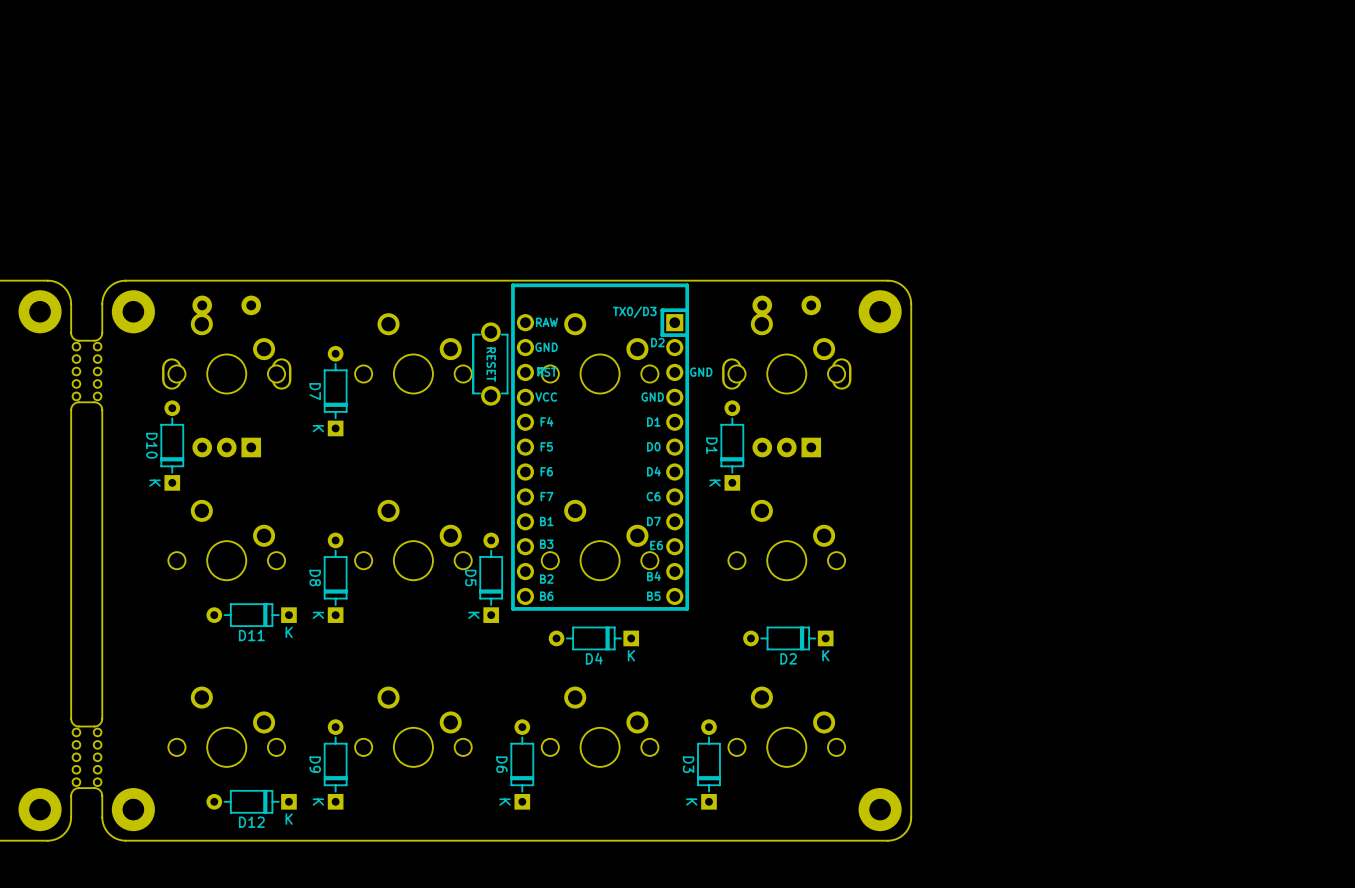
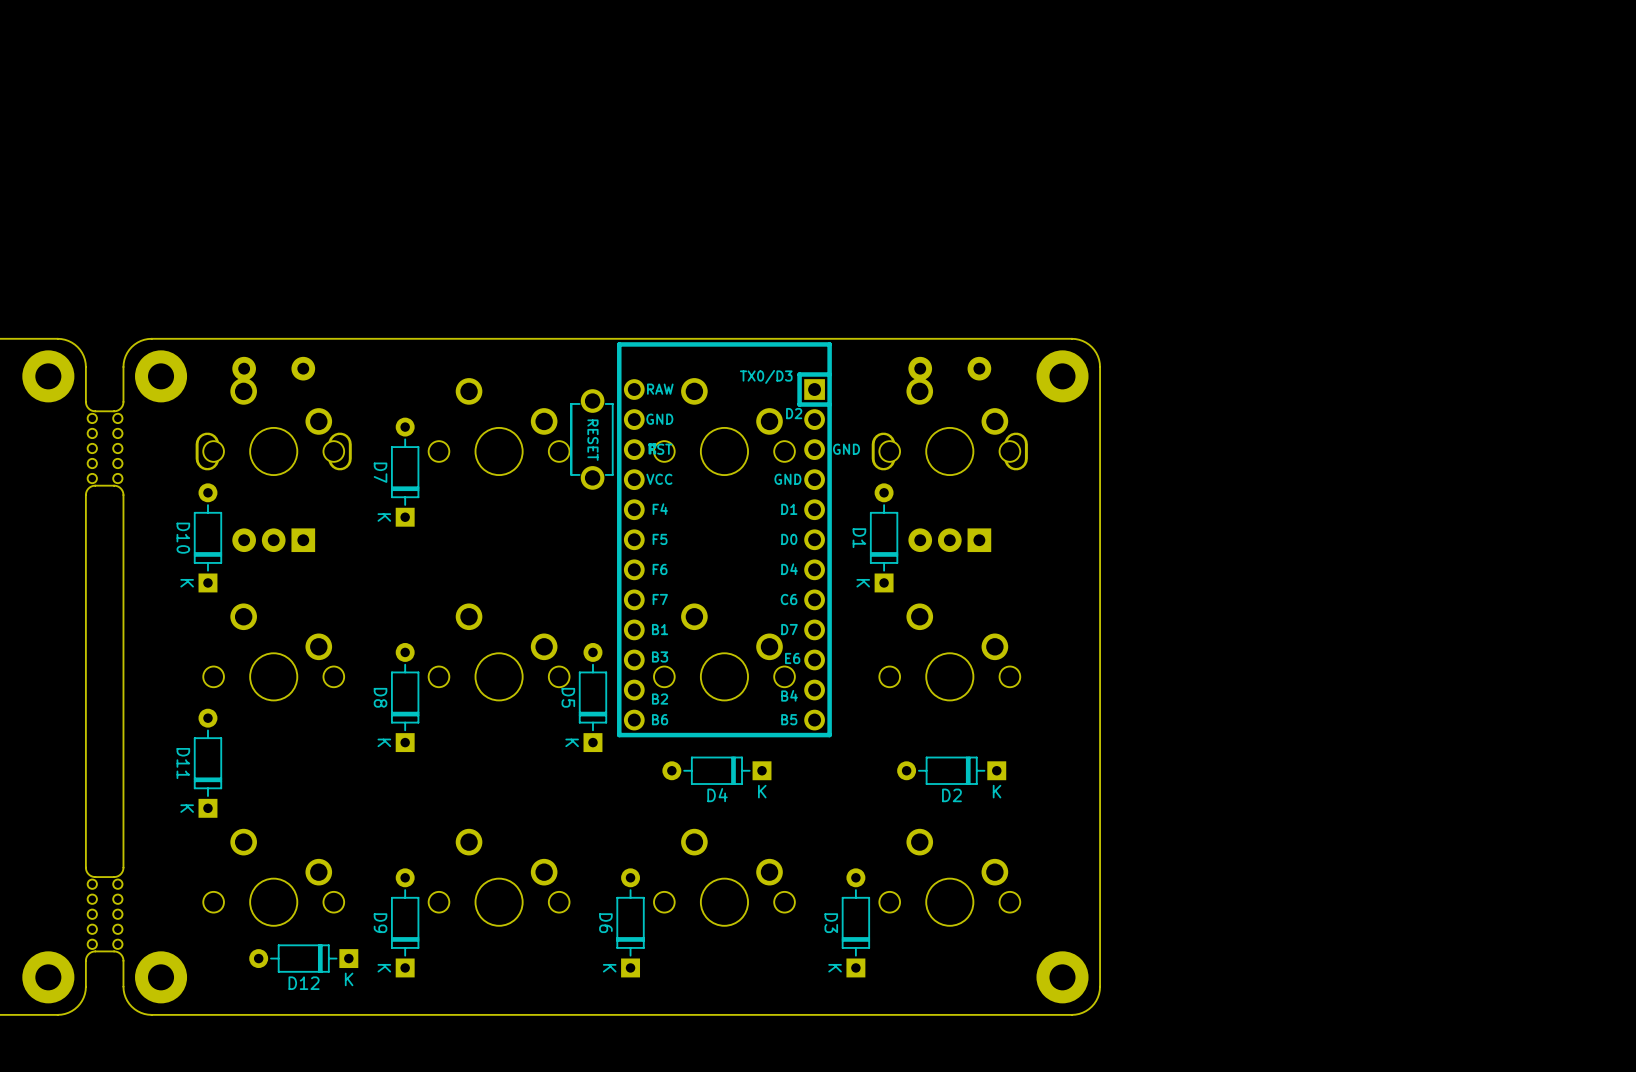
D11 rotation: 0° (251, 615) -> 90° clockwise (207, 763)
D11 position: (251, 615) -> (207, 763)
D12 footprint: [206, 790, 297, 814] -> [249, 944, 359, 973]

